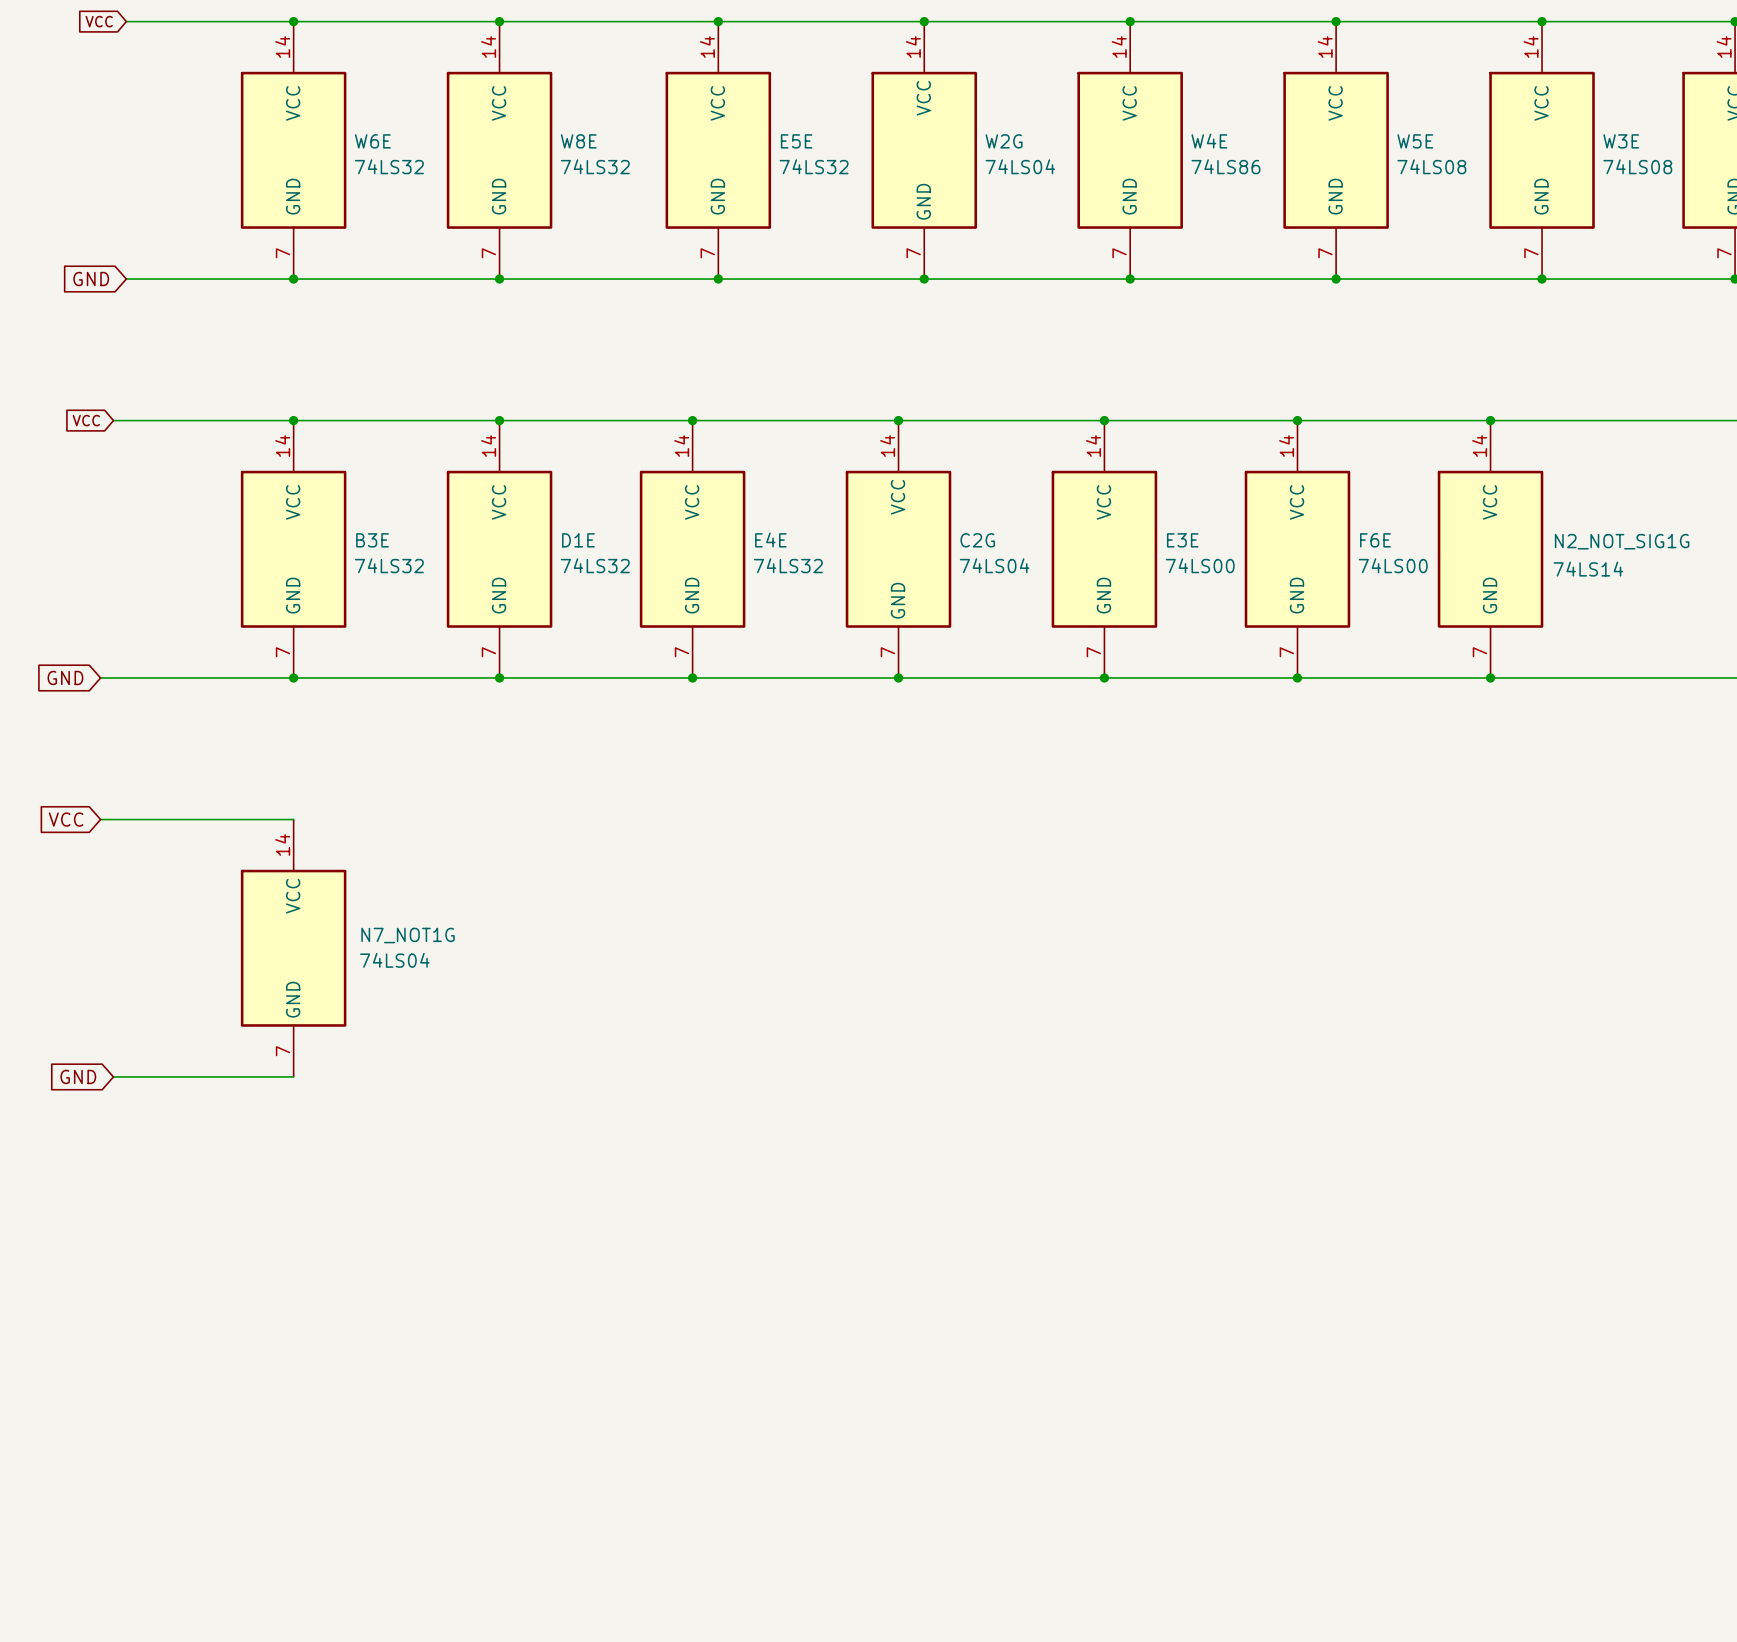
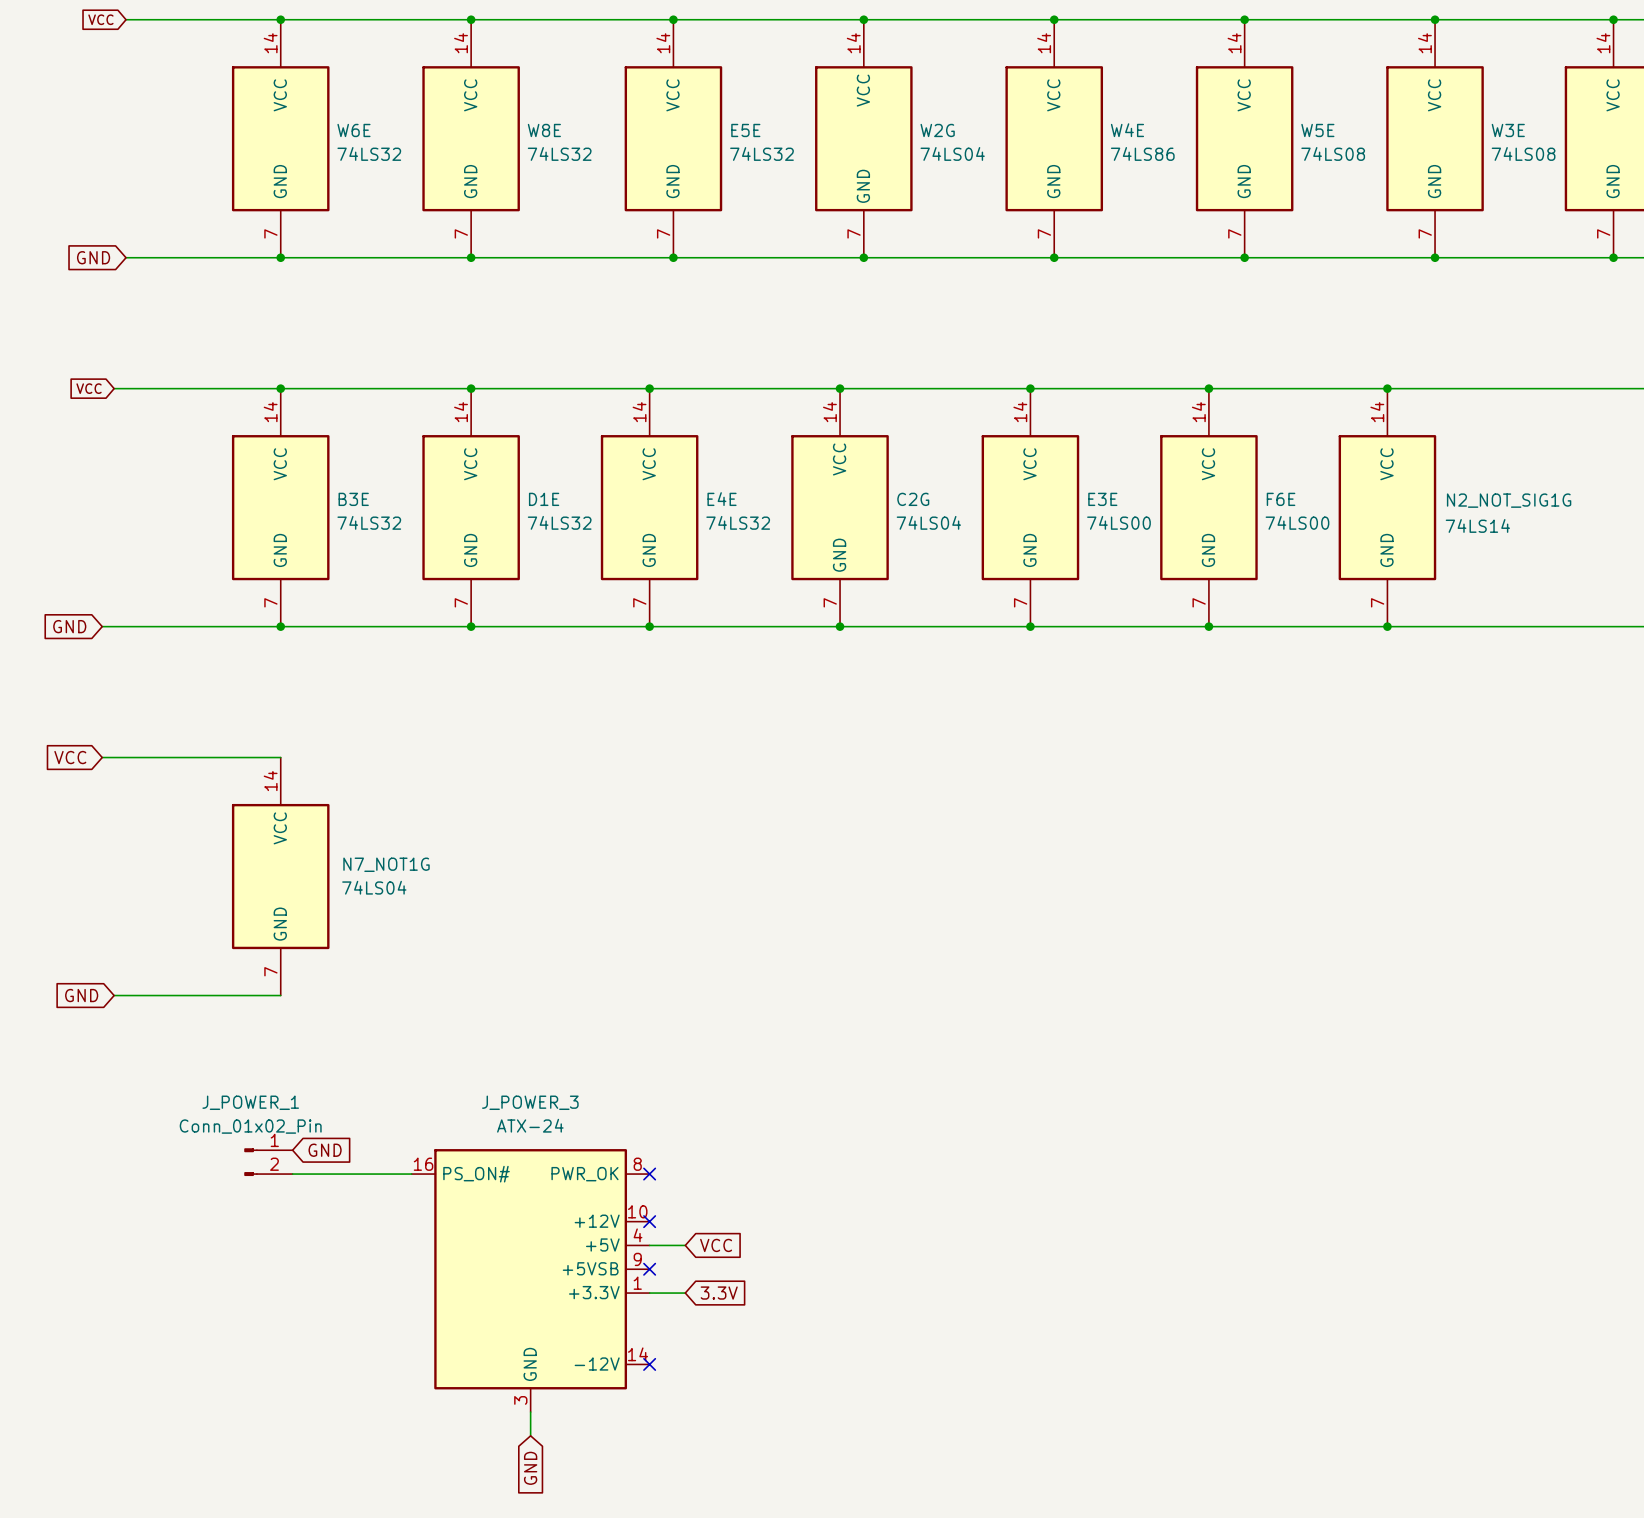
global label: none -> GND (325, 1150)
J_POWER_1: none -> Conn_01x02_Pin (268, 1162)
wire: none -> (292, 1174) (411, 1174)
no-connect mark: none -> (649, 1174)
no-connect mark: none -> (649, 1221)
wire: none -> (649, 1245) (685, 1245)
global label: none -> VCC (716, 1245)
no-connect mark: none -> (649, 1269)
J_POWER_3: none -> ATX-24 (530, 1280)
wire: none -> (649, 1293) (685, 1293)
global label: none -> 3.3V (719, 1293)
no-connect mark: none -> (649, 1364)
wire: none -> (530, 1412) (530, 1435)
global label: none -> GND (530, 1468)

